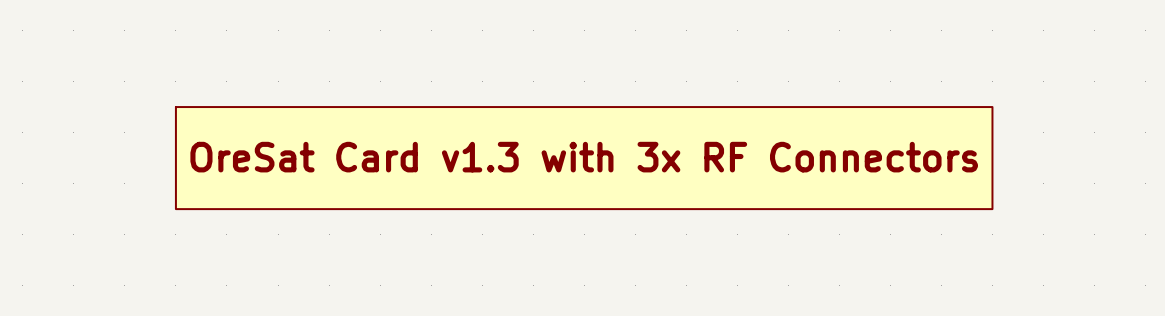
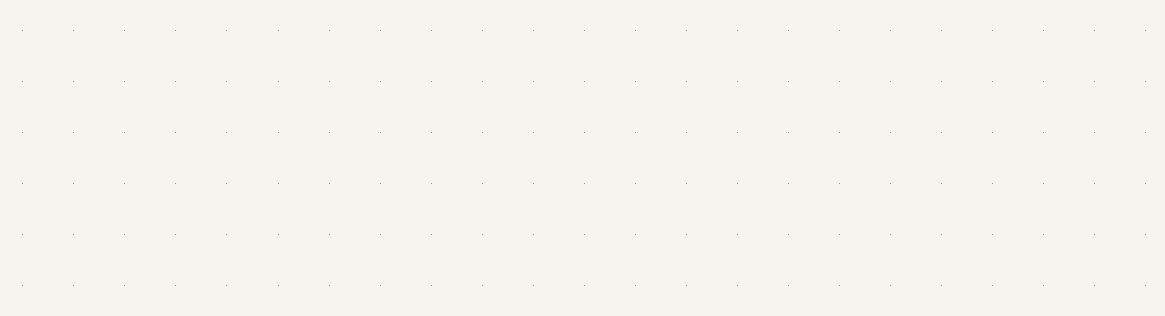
part: (584, 158) -> none

